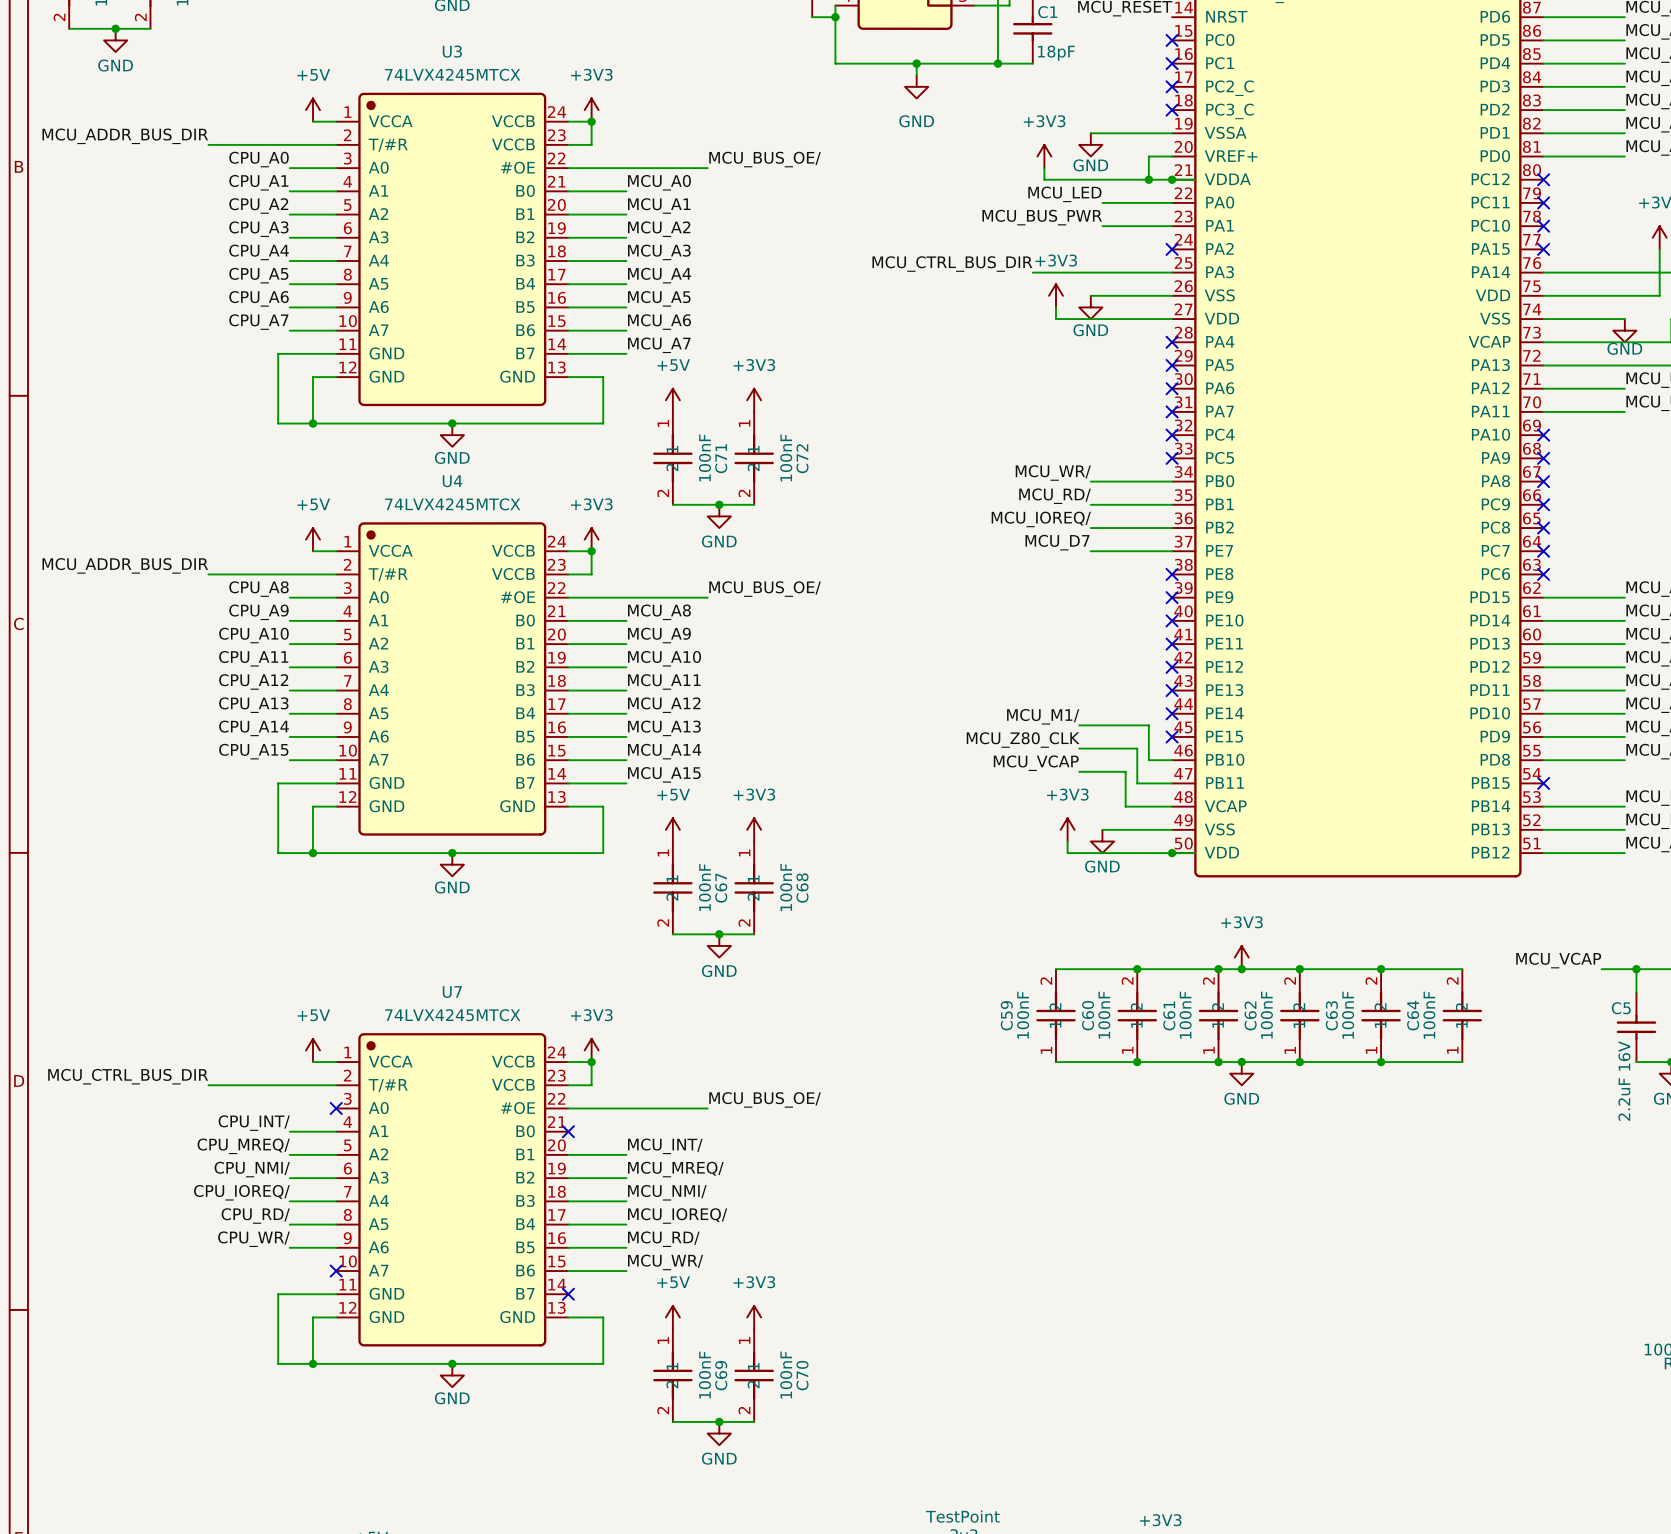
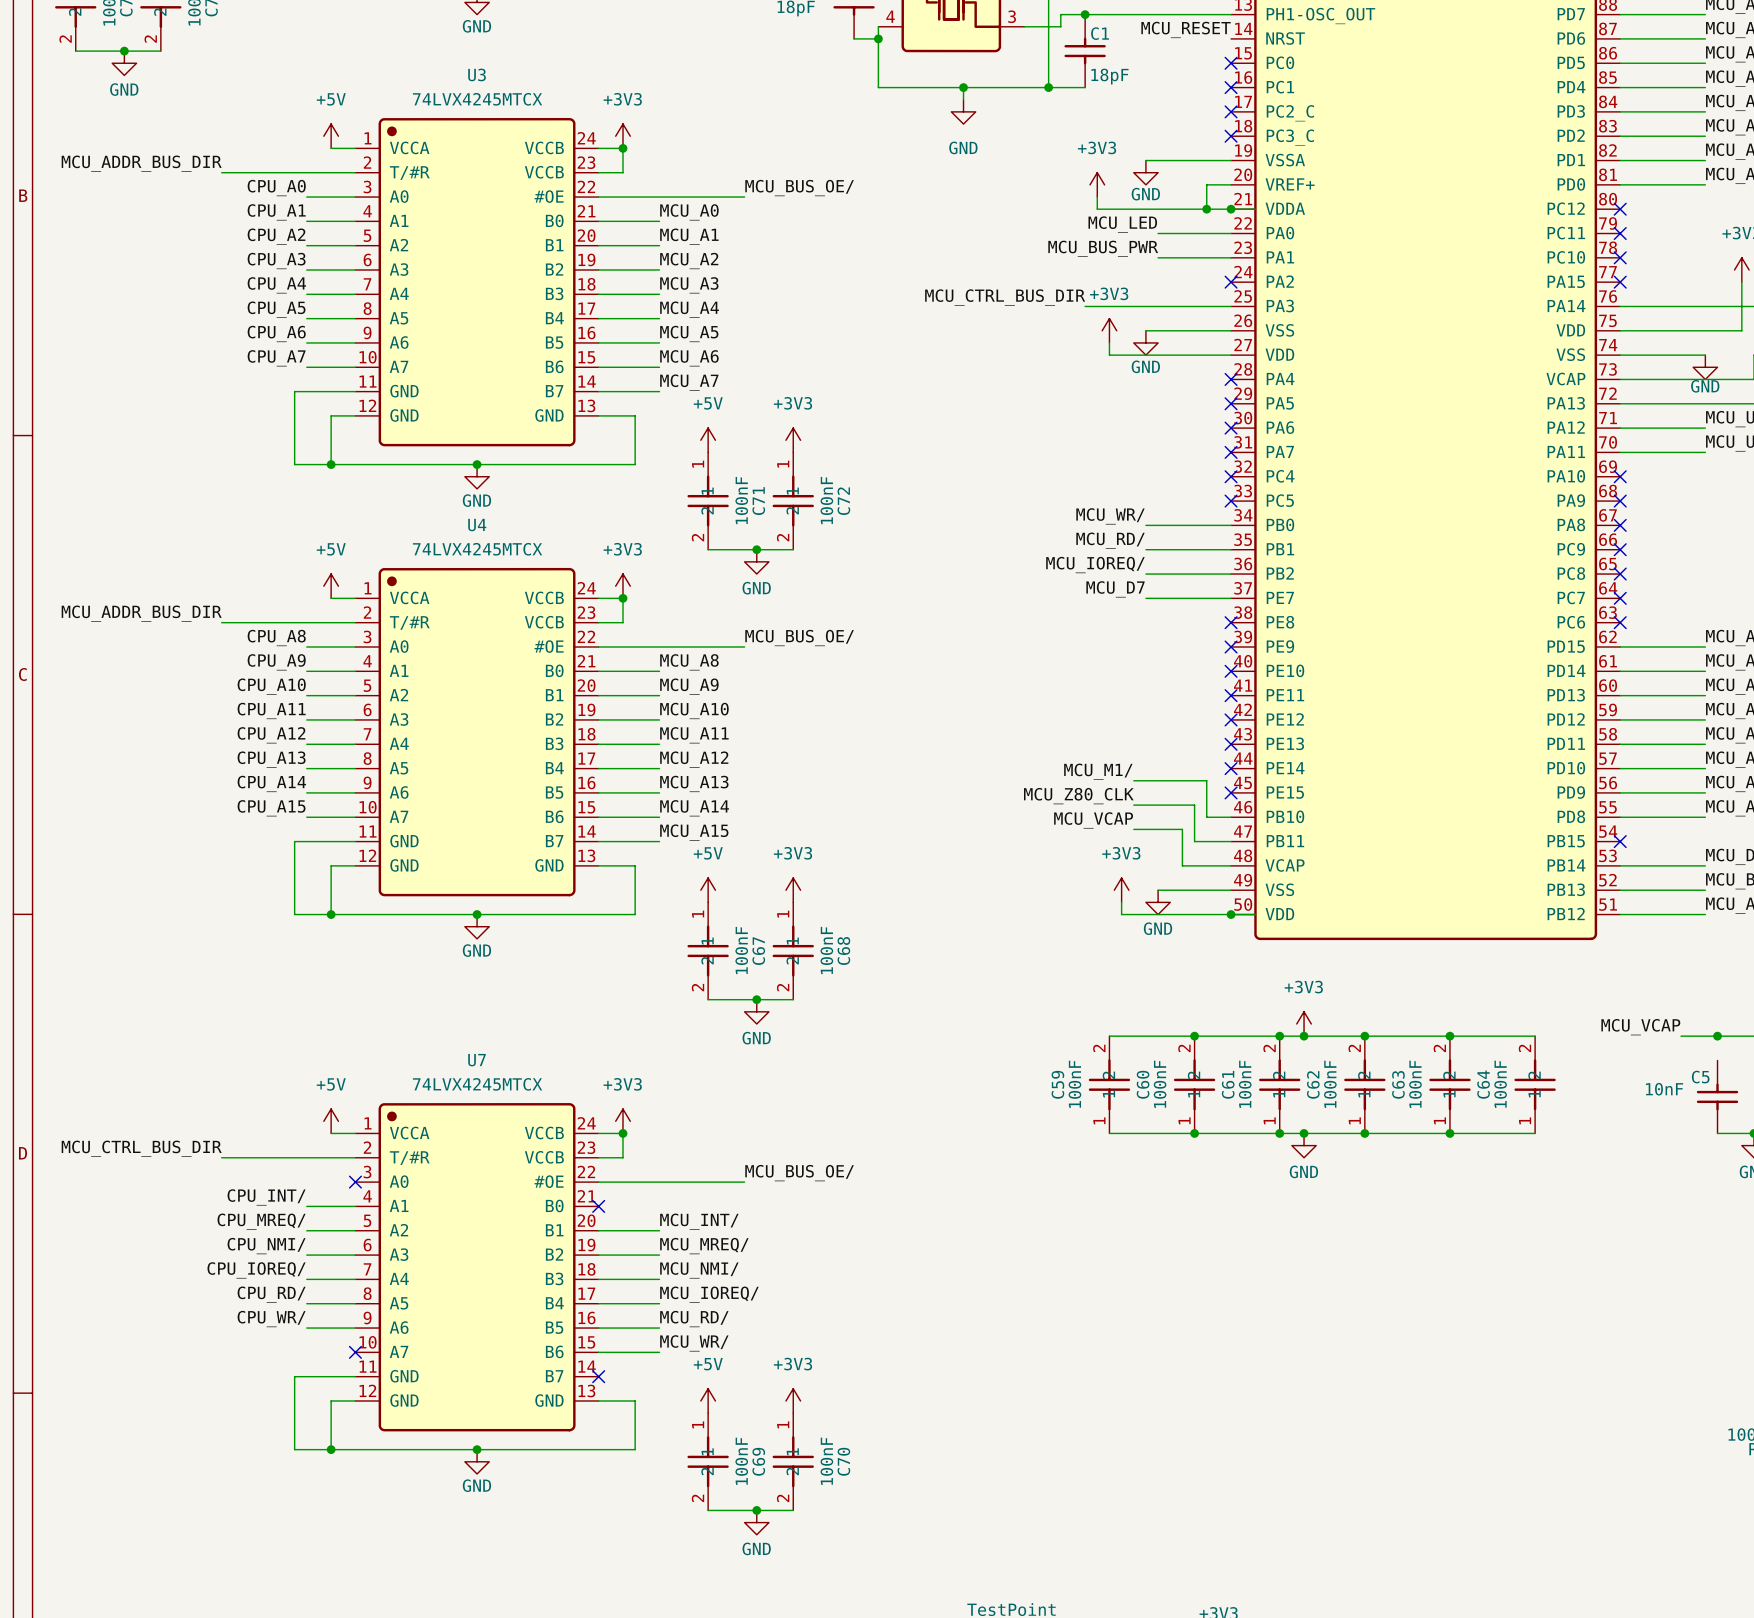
wire: (1636, 969) (1636, 992) -> none
C5 text: none -> 10nF (1664, 1089)
C5 value: 2.2uF 16V (1624, 1081) -> none

